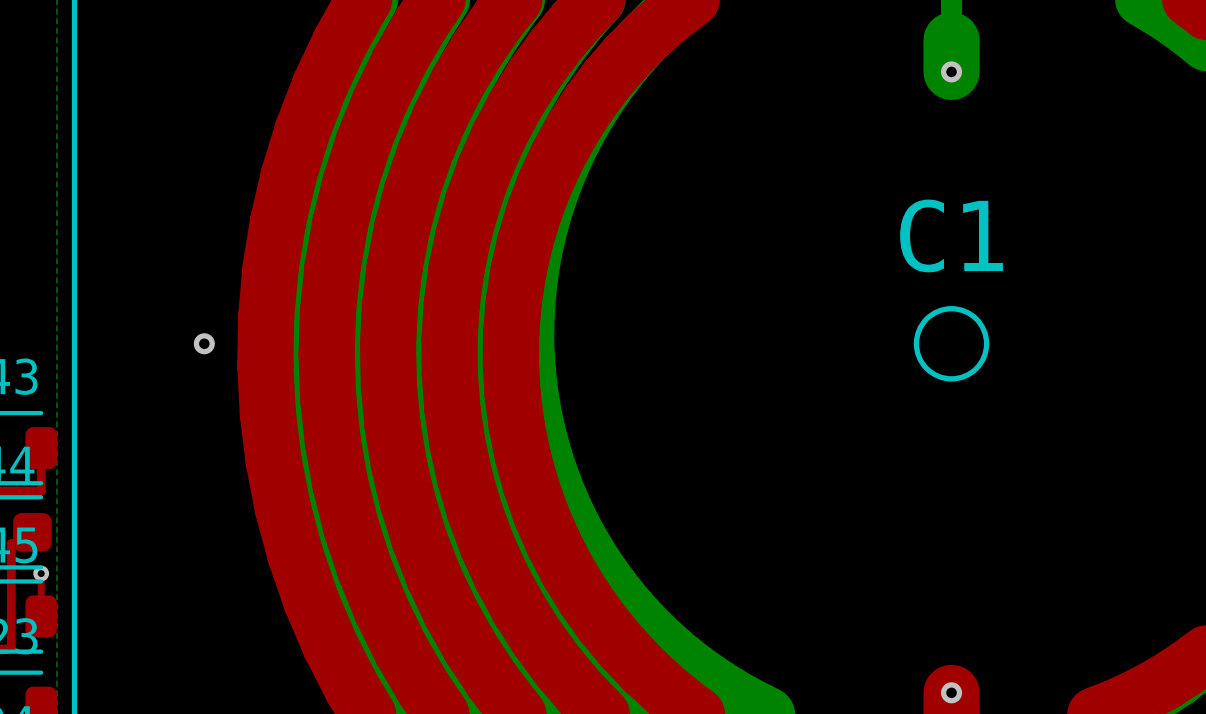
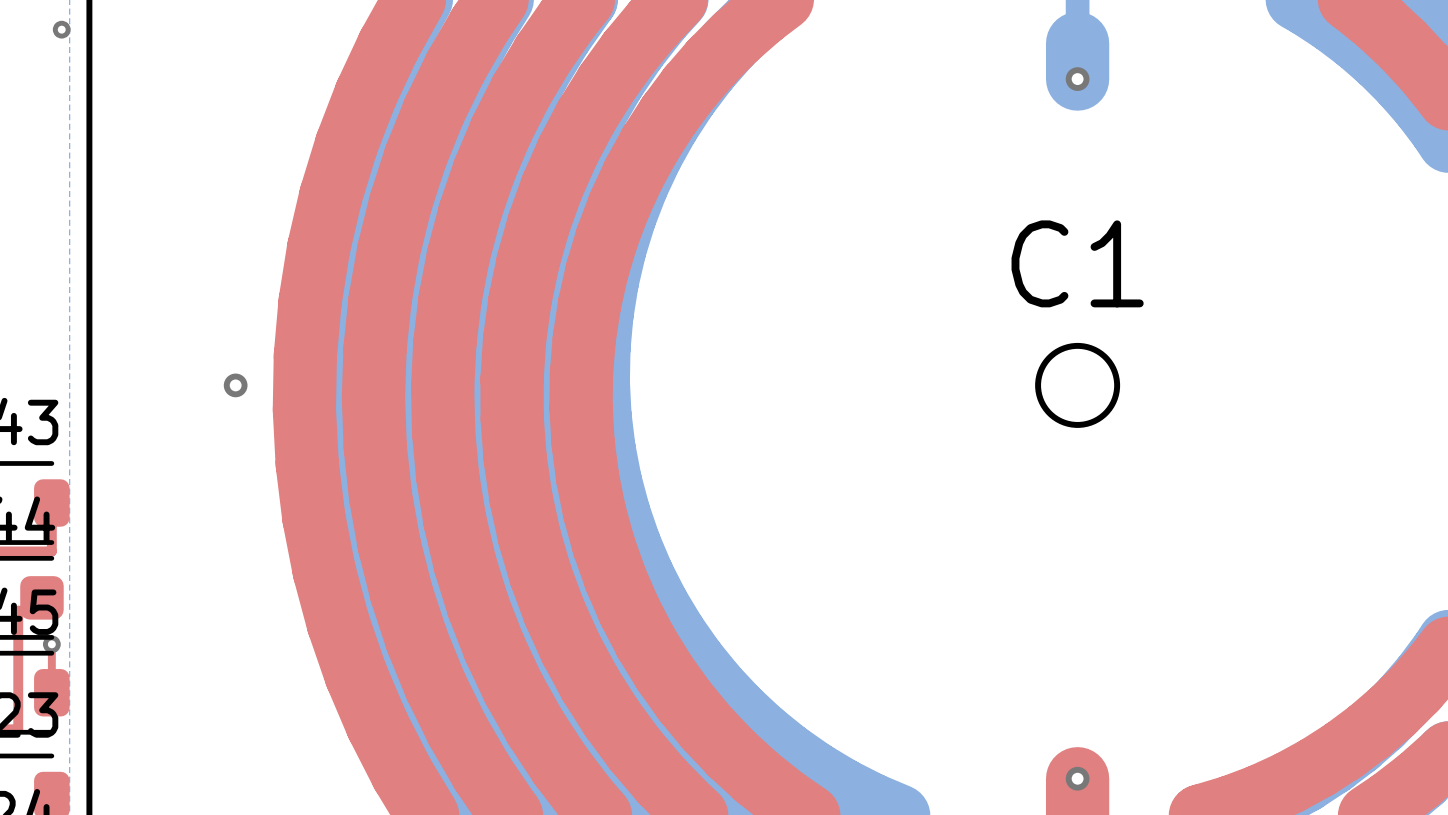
via: none -> (61, 29)

